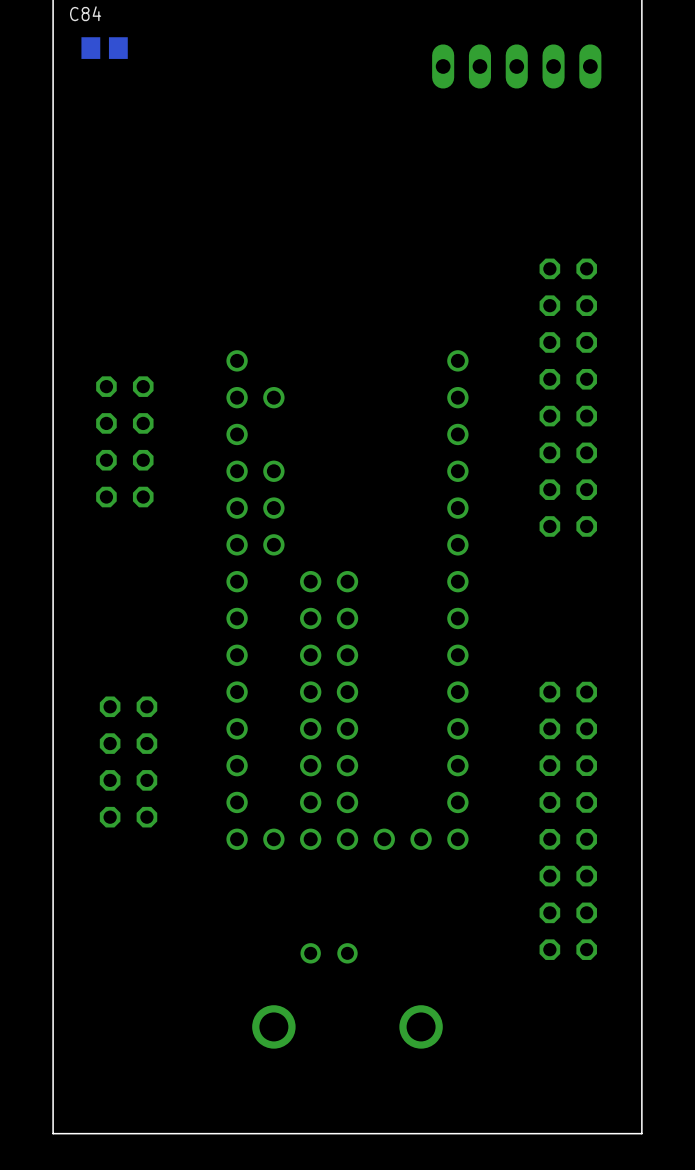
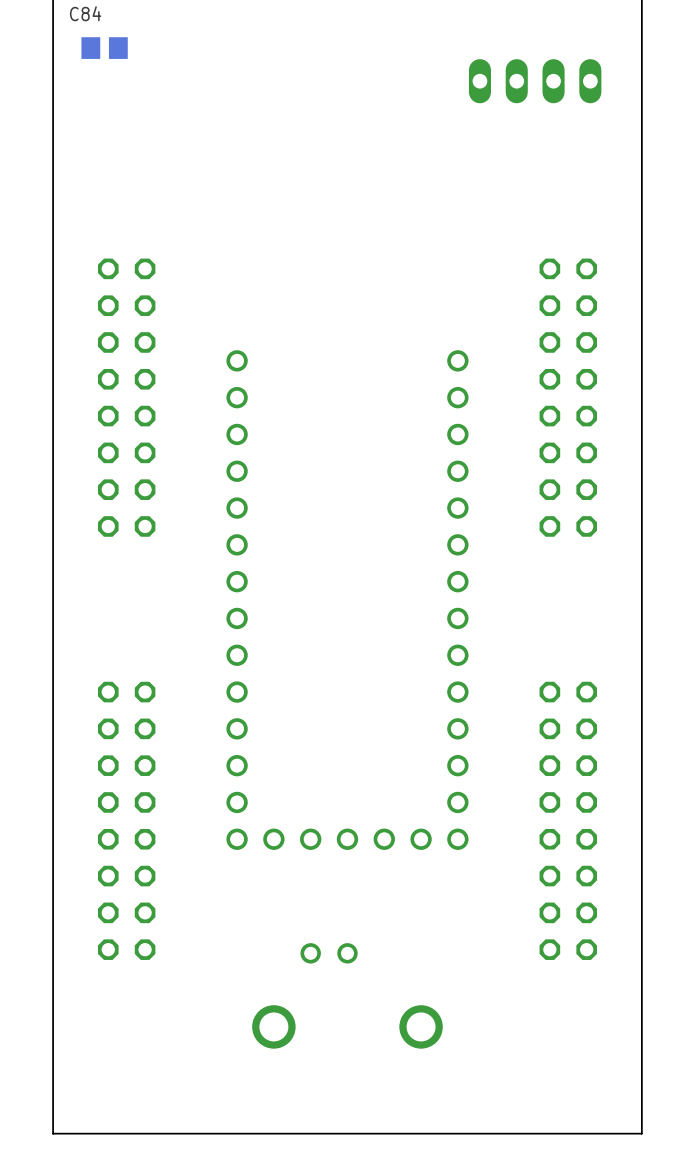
part: (516, 66) -> none
part: none -> (535, 81)
part footprint: [226, 350, 469, 850] -> [226, 350, 469, 850]
part: none -> (126, 397)
part: (124, 441) -> none
part: (128, 761) -> none
part: none -> (126, 820)

